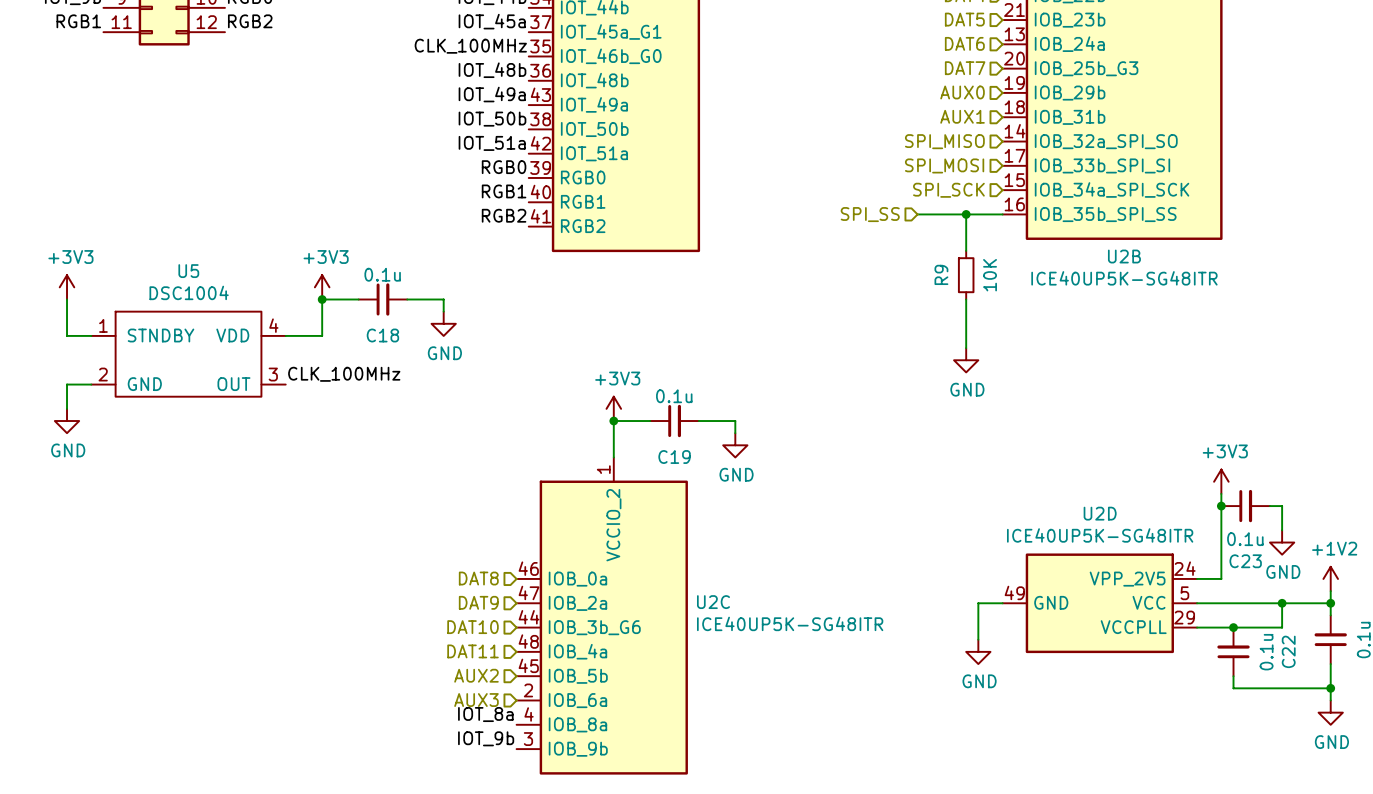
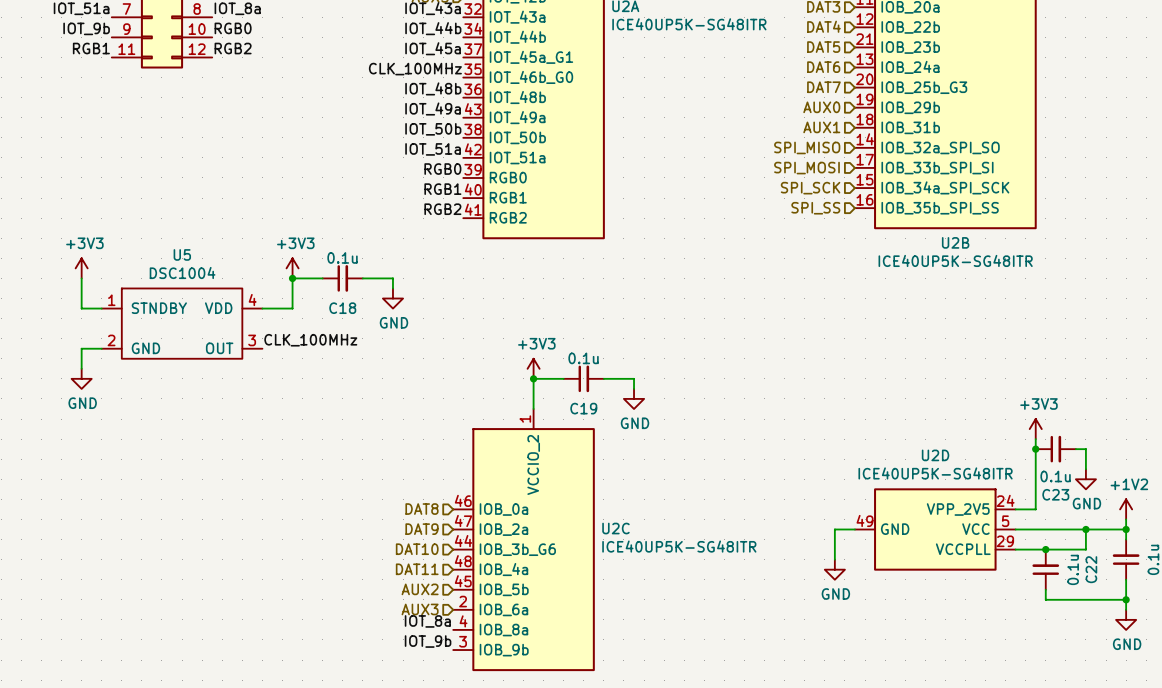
hierarchical label position: SPI_SS (870, 214) -> SPI_SS (815, 208)
wire: (917, 214) (1002, 214) -> none
wire: (966, 214) (966, 250) -> none
junction: (966, 214) -> none
R9: 10K (966, 275) -> none
wire: (966, 299) (966, 348) -> none
power symbol: GND (966, 360) -> none

